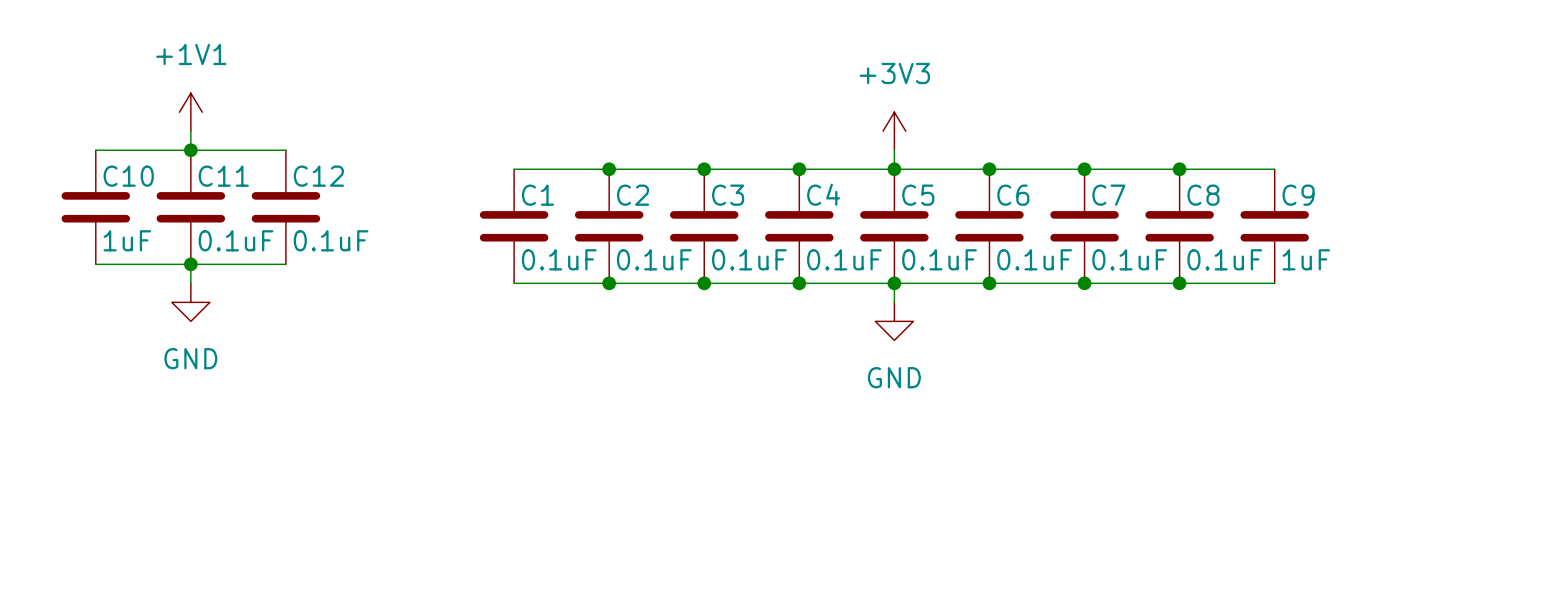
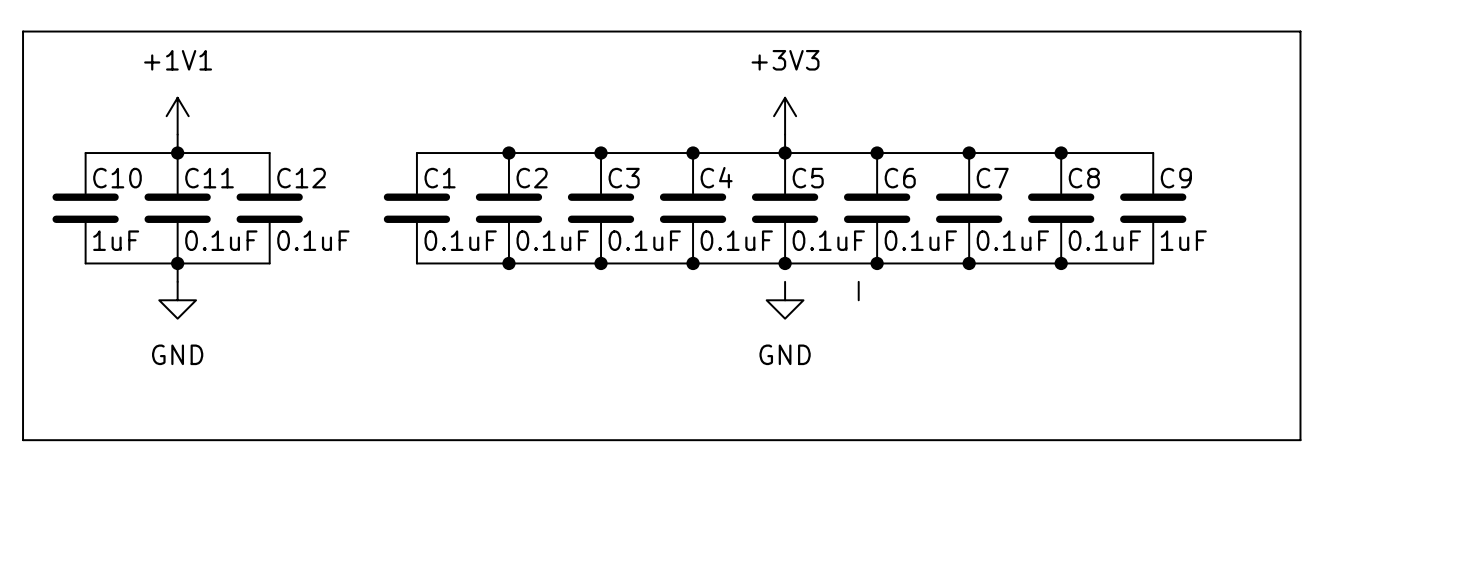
line: none -> (23, 31) (1300, 31) (1300, 440) (23, 440) (23, 31)
power symbol position: +3V3 (894, 131) -> +3V3 (785, 116)
junction: none -> (508, 153)
wire: (894, 150) (894, 169) -> (785, 134) (785, 153)
wire: (514, 169) (1274, 169) -> (416, 153) (1153, 153)
junction position: (609, 169) -> (601, 153)
junction position: (704, 169) -> (693, 153)
junction position: (799, 169) -> (785, 153)
junction position: (894, 169) -> (877, 153)
junction position: (989, 169) -> (969, 153)
junction position: (1084, 169) -> (1061, 153)
junction: (1179, 169) -> none
C1 position: (514, 226) -> (416, 208)
C2 position: (609, 226) -> (508, 208)
C3 position: (704, 226) -> (601, 208)
C4 position: (799, 226) -> (693, 208)
C5 position: (894, 226) -> (785, 208)
C6 position: (989, 226) -> (877, 208)
C7 position: (1084, 226) -> (969, 208)
C8 position: (1179, 226) -> (1061, 208)
C9 position: (1274, 226) -> (1153, 208)
junction: none -> (508, 263)
wire: (514, 283) (1274, 283) -> (416, 263) (1153, 263)
junction position: (609, 283) -> (601, 263)
junction position: (704, 283) -> (693, 263)
junction position: (799, 283) -> (785, 263)
junction position: (894, 283) -> (877, 263)
junction position: (989, 283) -> (969, 263)
junction position: (1084, 283) -> (1061, 263)
junction: (1179, 283) -> none
power symbol position: GND (894, 321) -> GND (785, 300)

